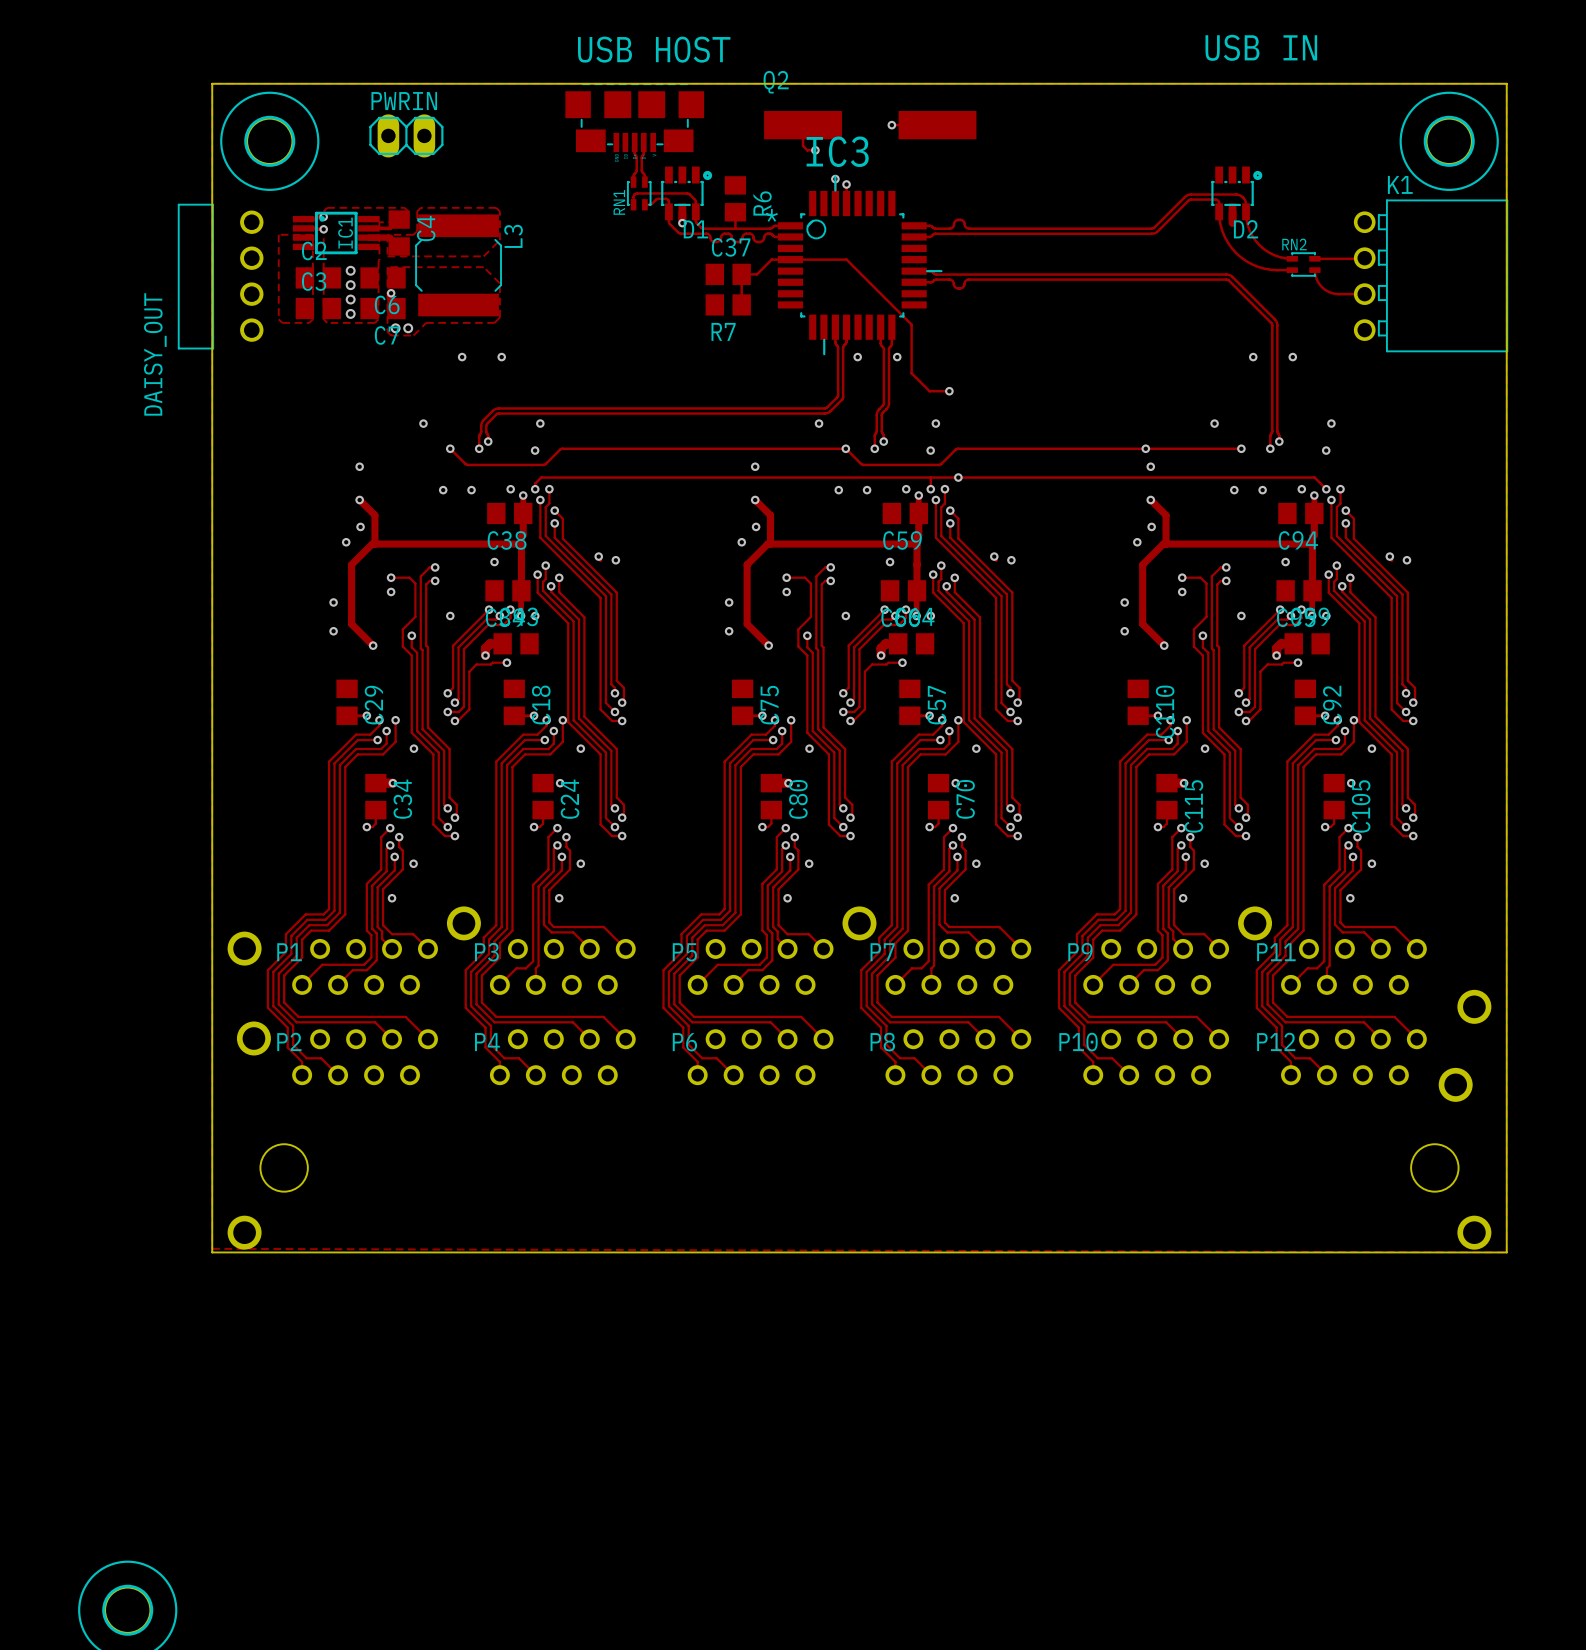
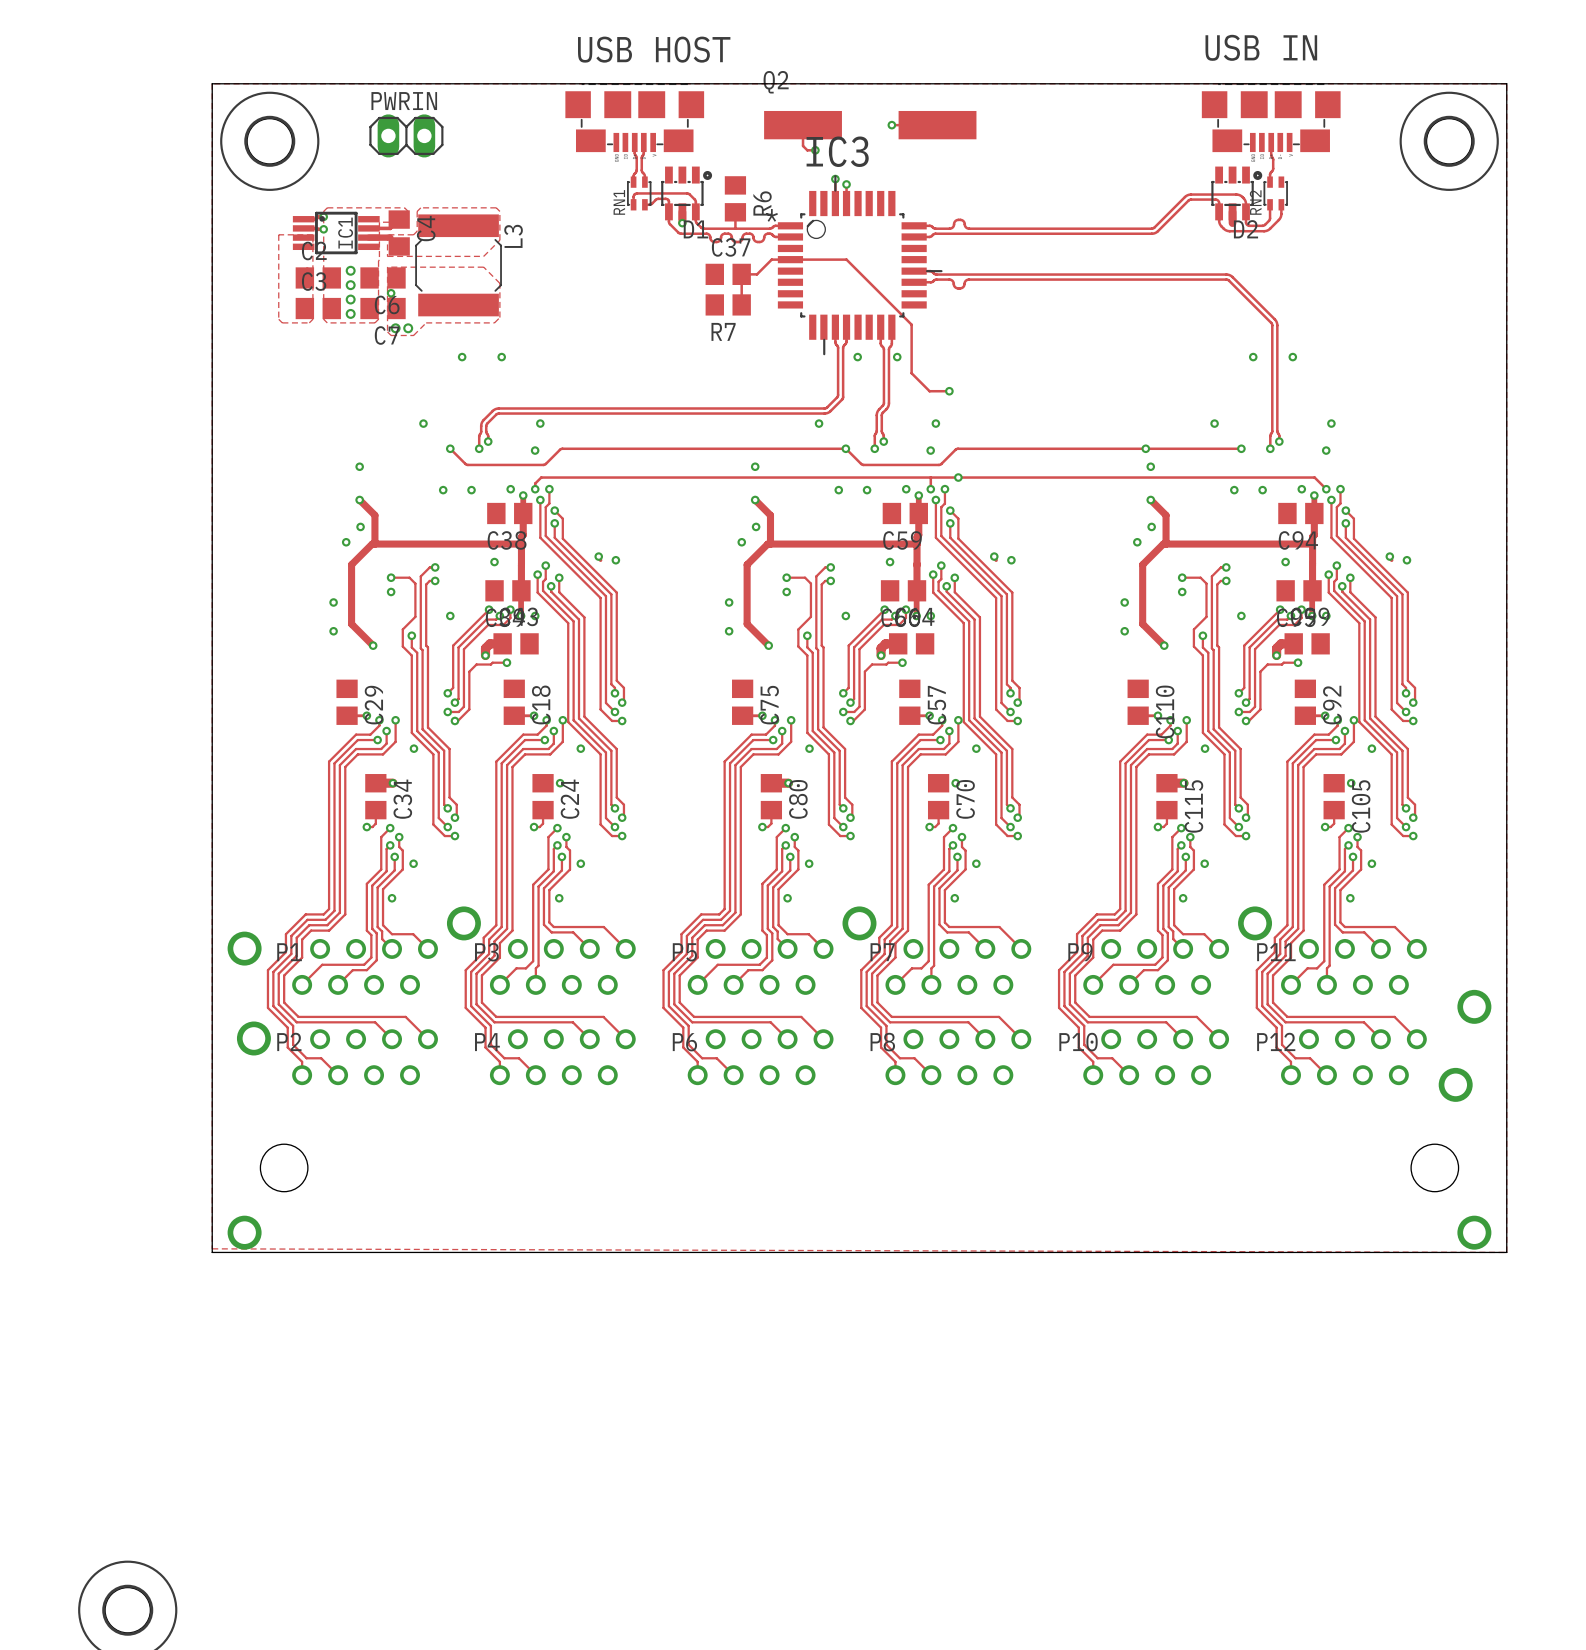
part: none -> (1271, 117)
track: none -> (1271, 142) (1273, 168) (1270, 173) (1270, 182)
track: (1219, 211) (1224, 237) (1241, 257) (1264, 268) (1292, 270) -> (1219, 211) (1219, 223) (1226, 230) (1265, 231) (1280, 218) (1281, 204)
track: (1246, 212) (1249, 230) (1259, 245) (1274, 255) (1292, 258) -> (1246, 212) (1247, 225) (1263, 225) (1269, 219) (1270, 204)
track: (1364, 258) (1314, 258) -> none
RN2 rotation: 0° (1303, 264) -> 90° clockwise (1275, 193)
RN2 position: (1303, 264) -> (1275, 193)
track: (1314, 270) (1319, 284) (1329, 292) (1364, 294) -> none
K1: (1431, 275) -> none
DAISY_OUT: (220, 276) -> none

